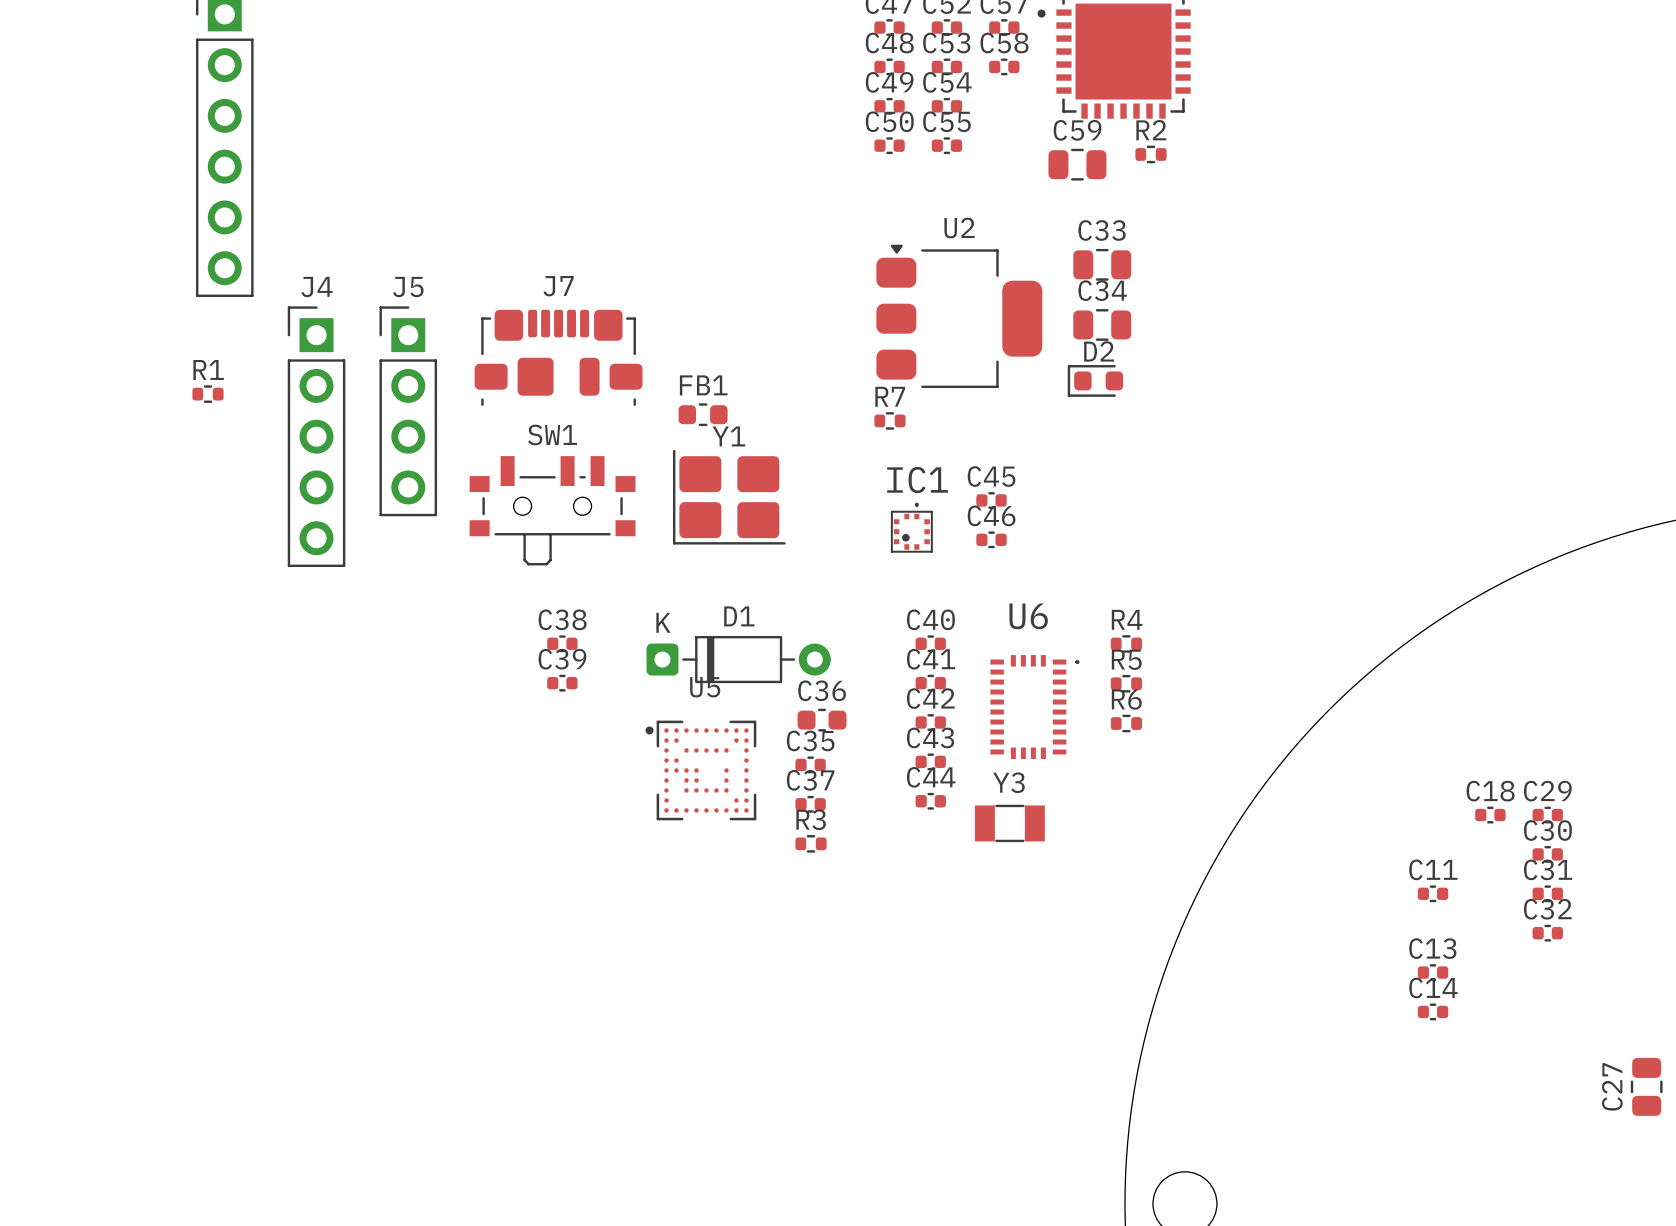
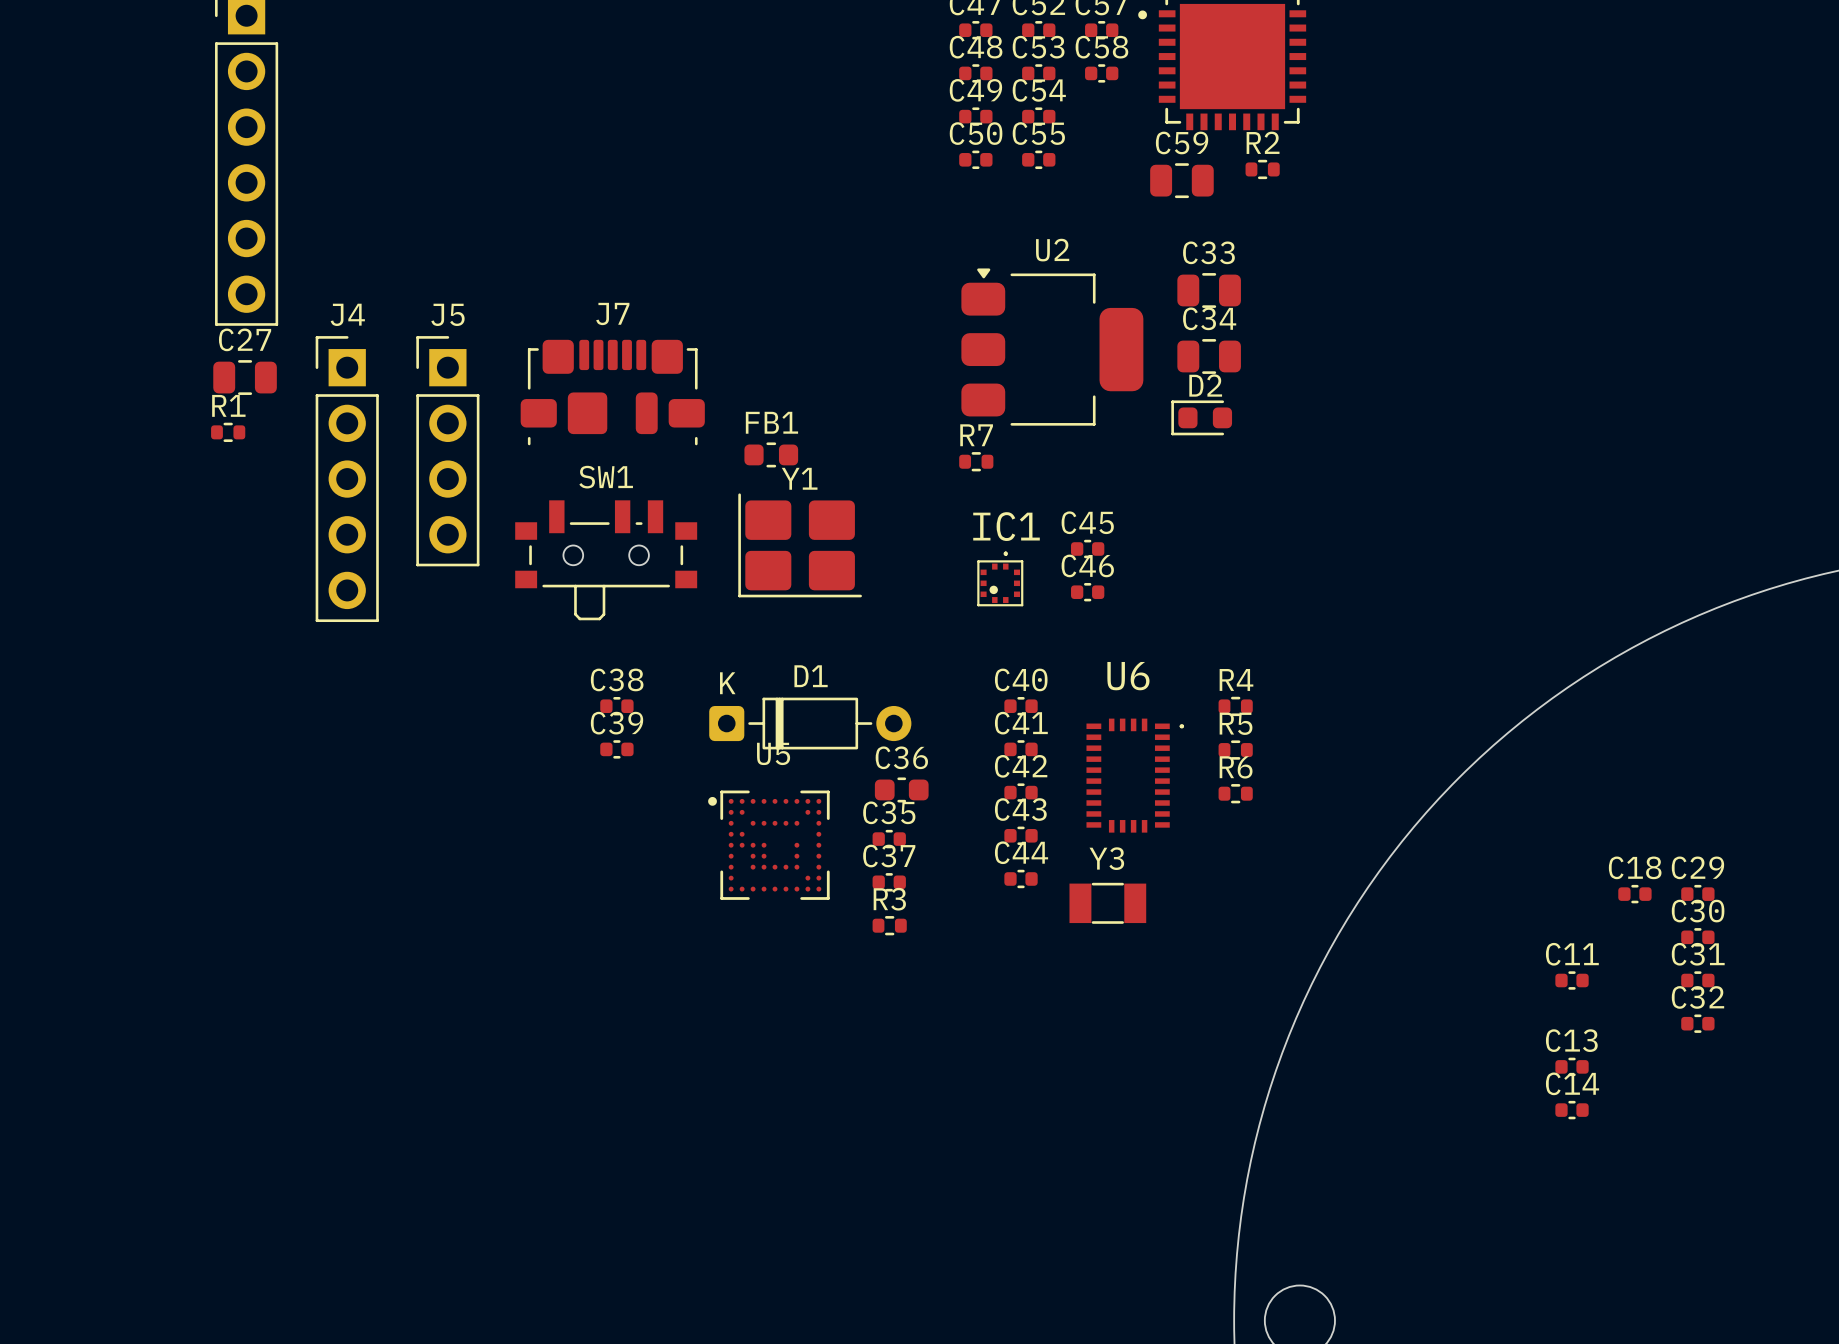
C27 rotation: 0° (1646, 1086) -> 90° clockwise (245, 377)
C27 position: (1646, 1086) -> (245, 377)

